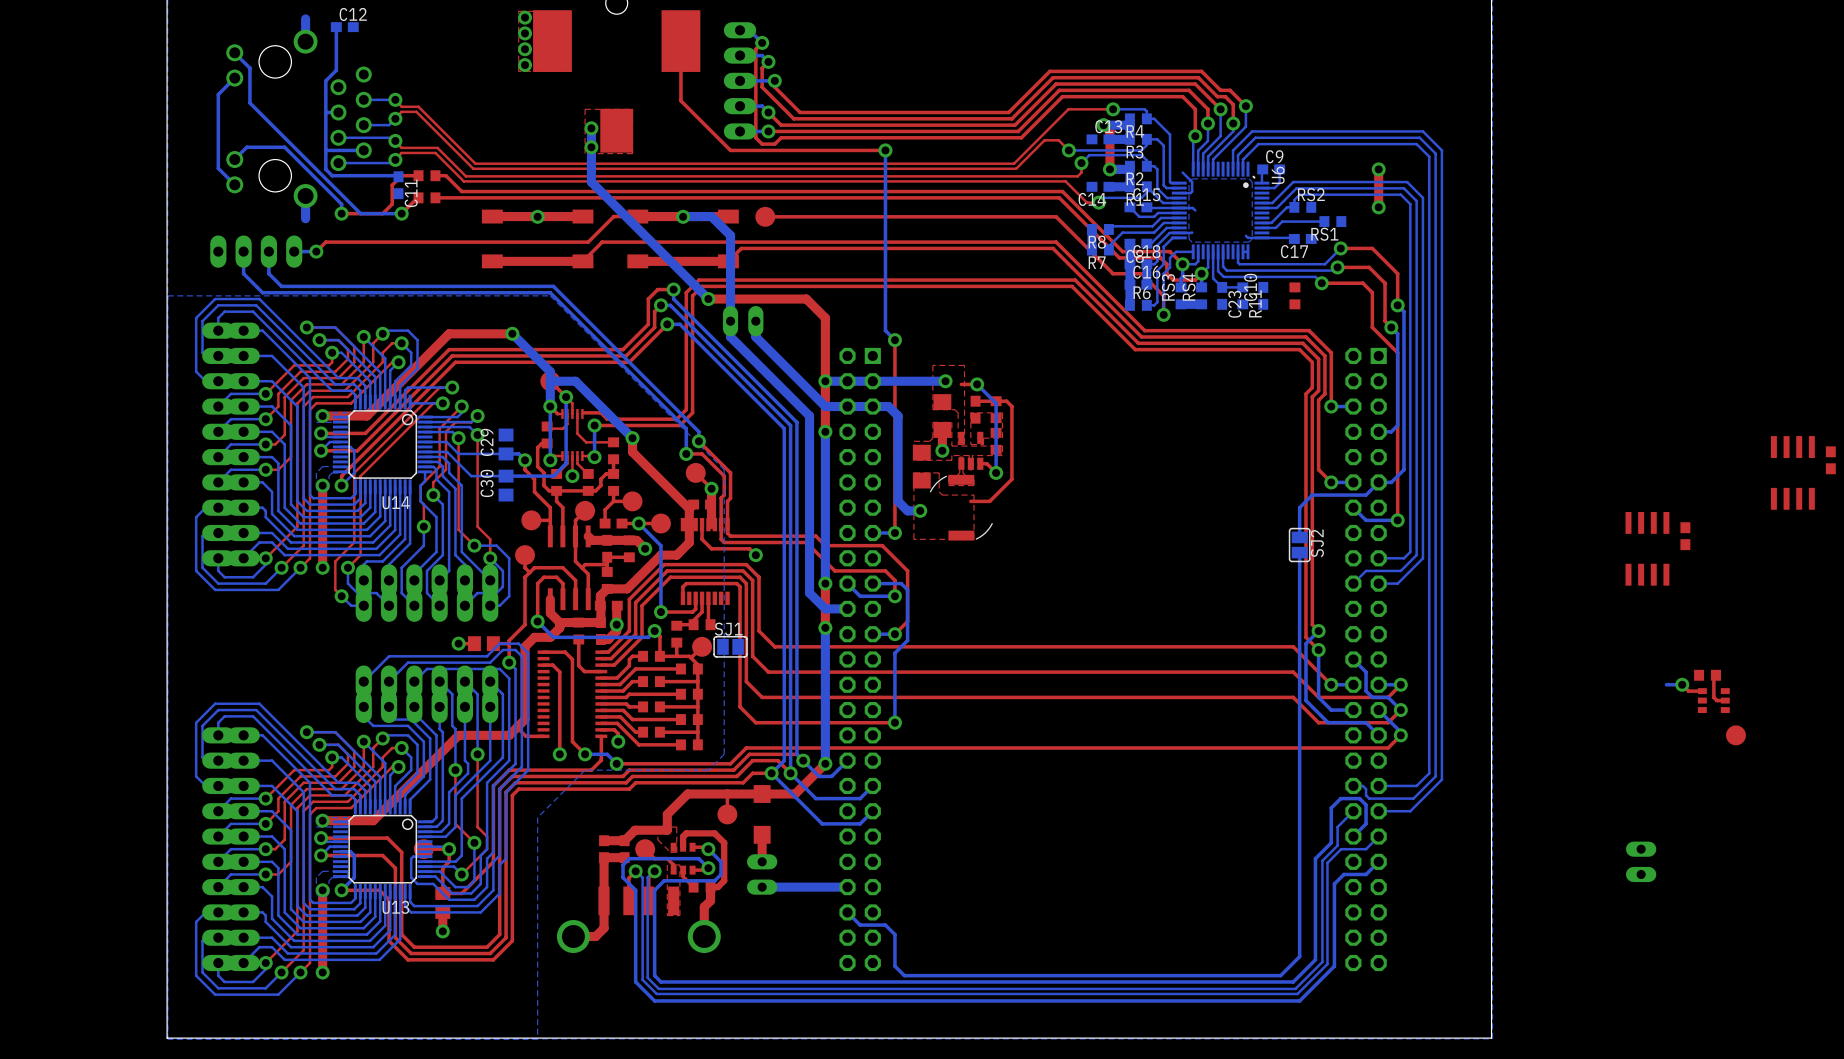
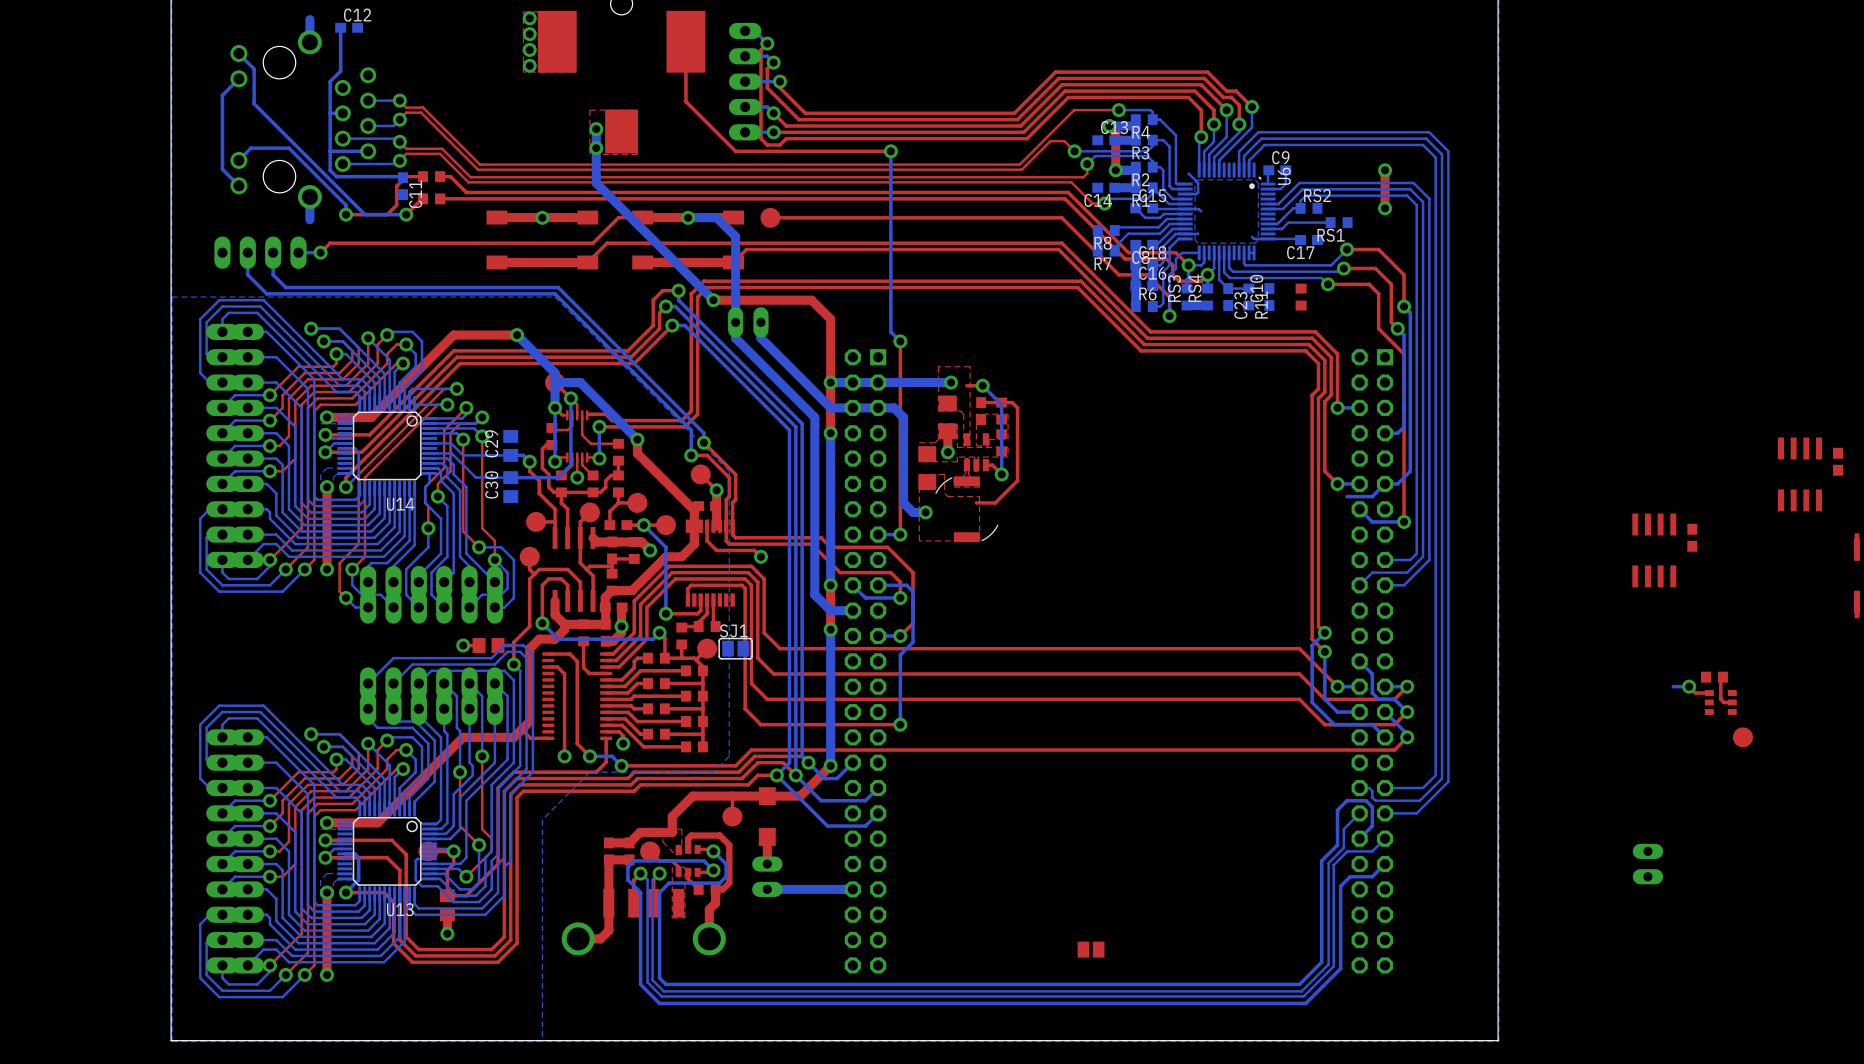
bottom track: (1340, 495) (1312, 495) (1299, 507) (1299, 537) -> none
SJ2: (1299, 545) -> none
bottom track: (1299, 552) (1299, 956) (1280, 975) (904, 975) (894, 966) (894, 934) (885, 925) (860, 925) (847, 912) -> none
part: none -> (1091, 949)

